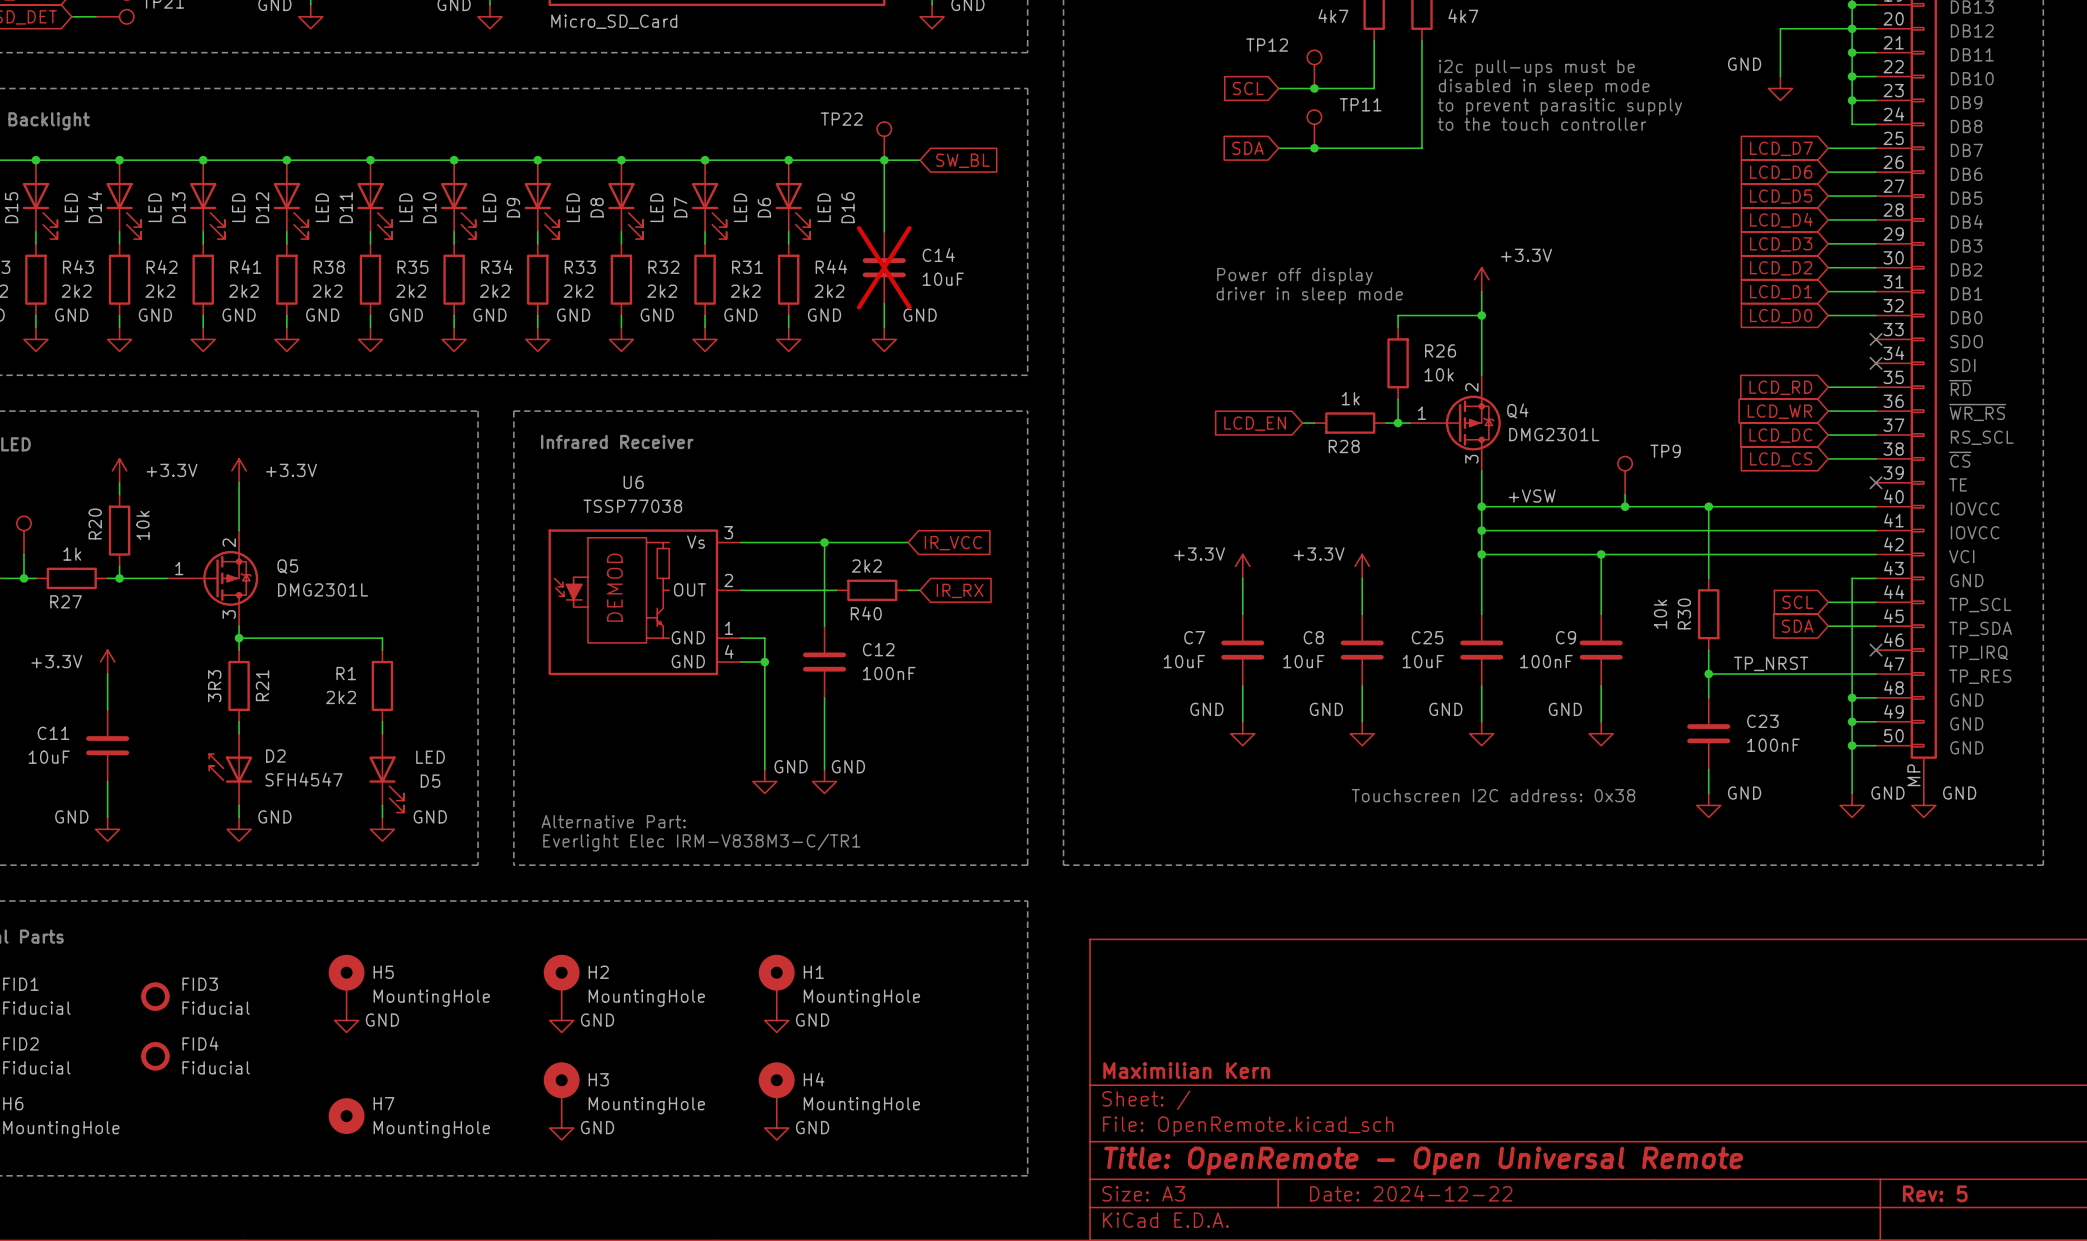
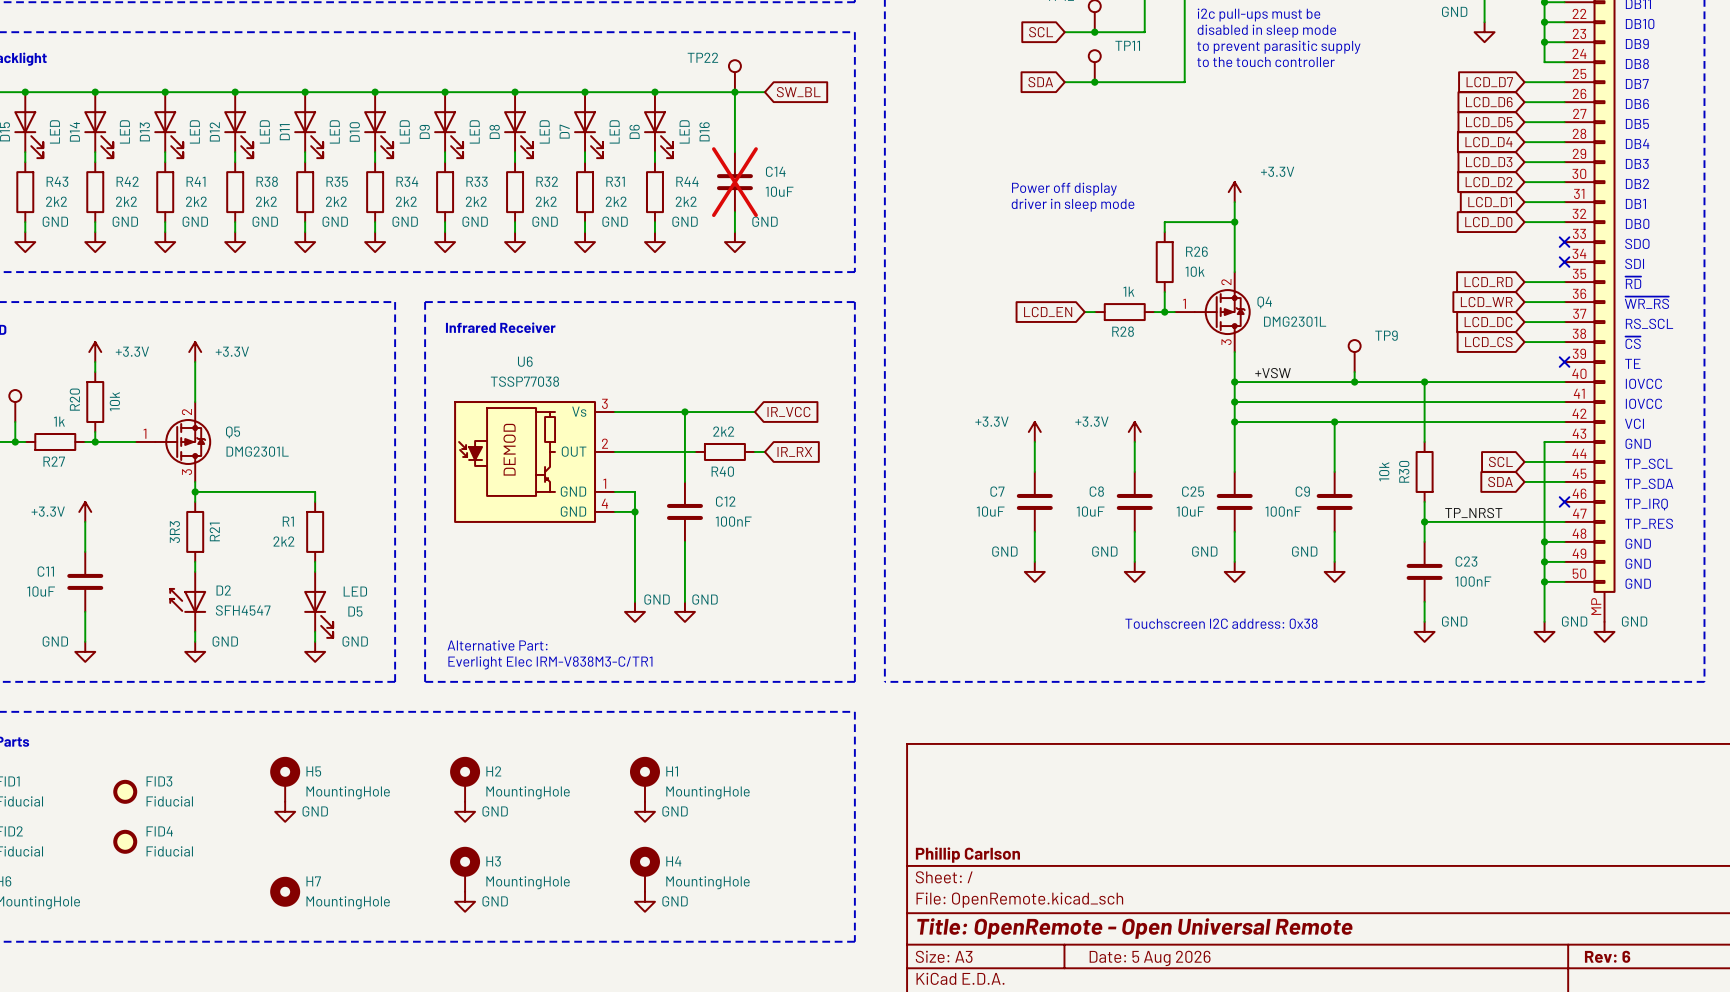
title block: Maximilian Kern (1186, 1070) -> Phillip Carlson (967, 855)
title block: Date: 2024-12-22 (1411, 1193) -> Date: 5 Aug 2026 (1150, 958)
title block: Rev: 5 (1935, 1193) -> Rev: 6 (1607, 956)

